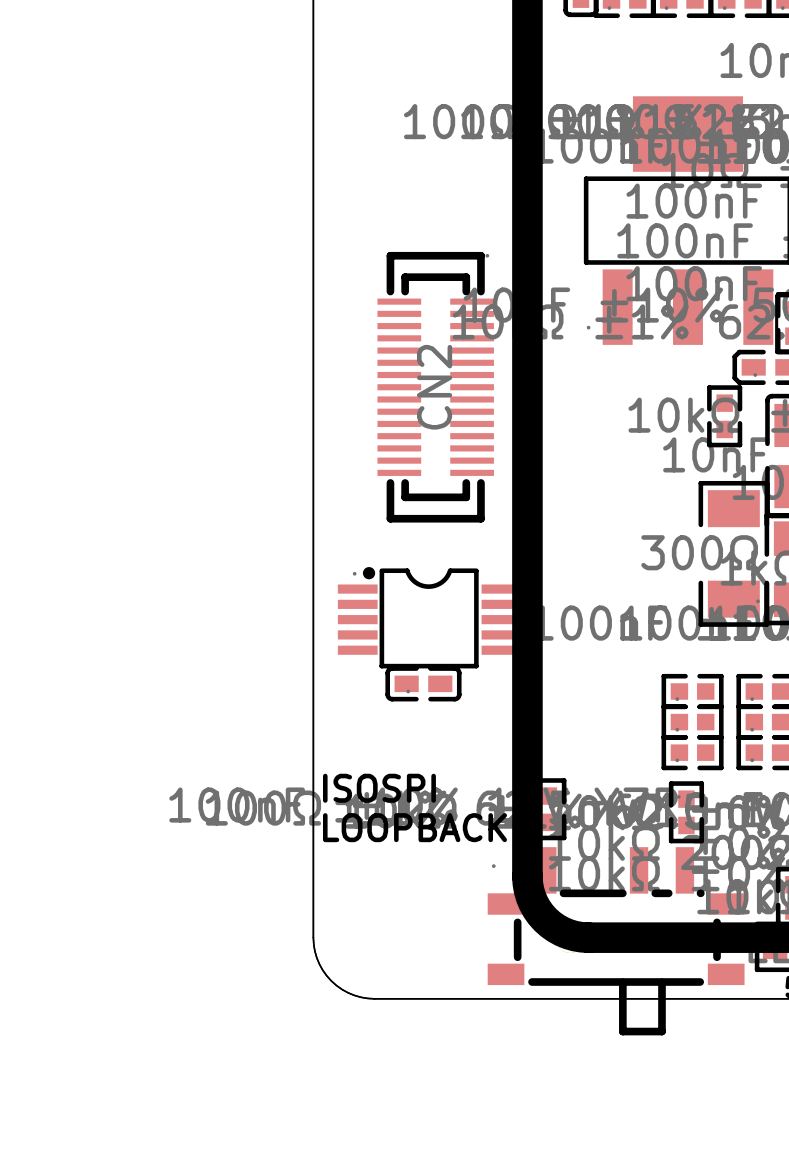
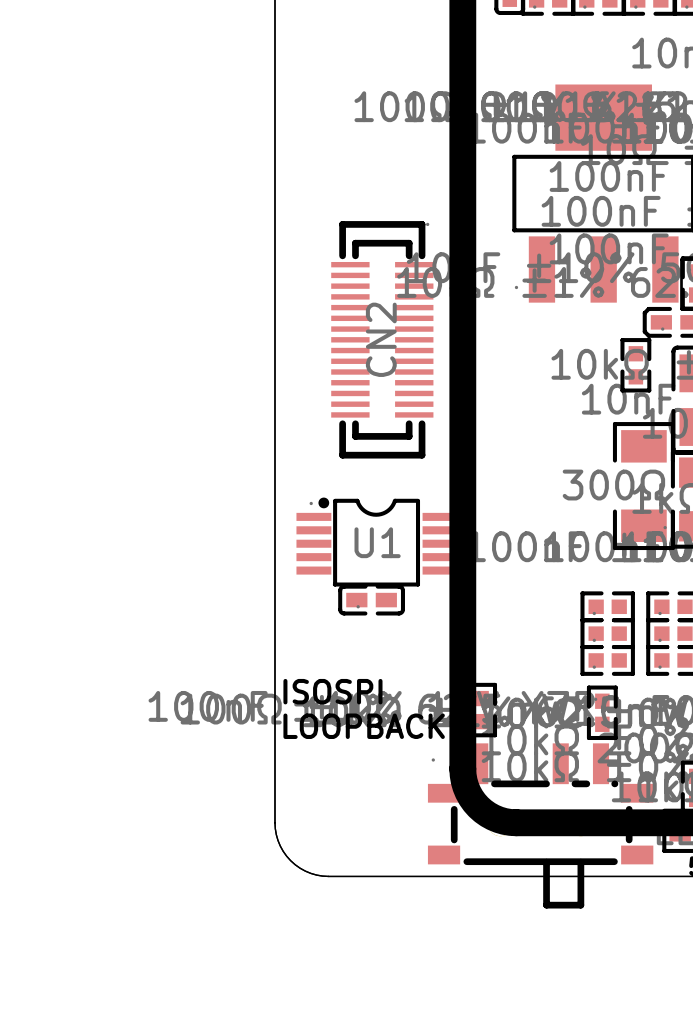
U1 name: none -> U1 (377, 542)

